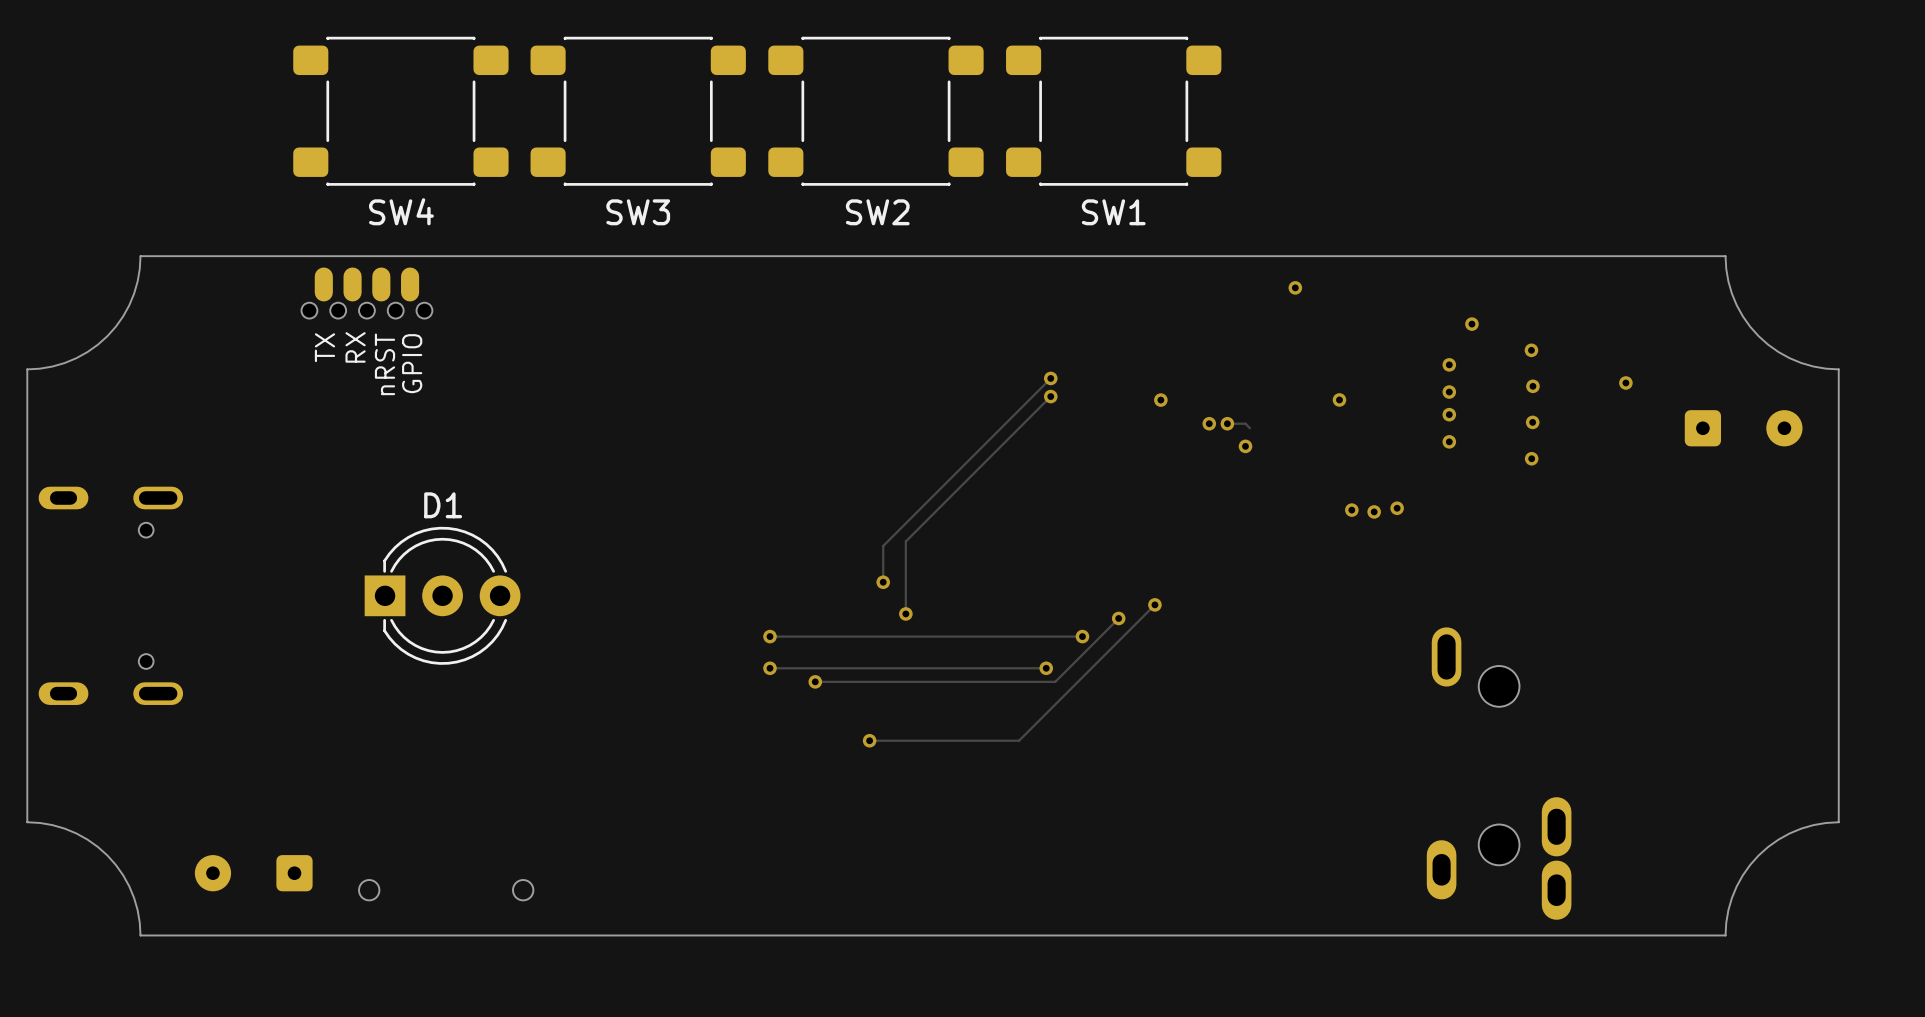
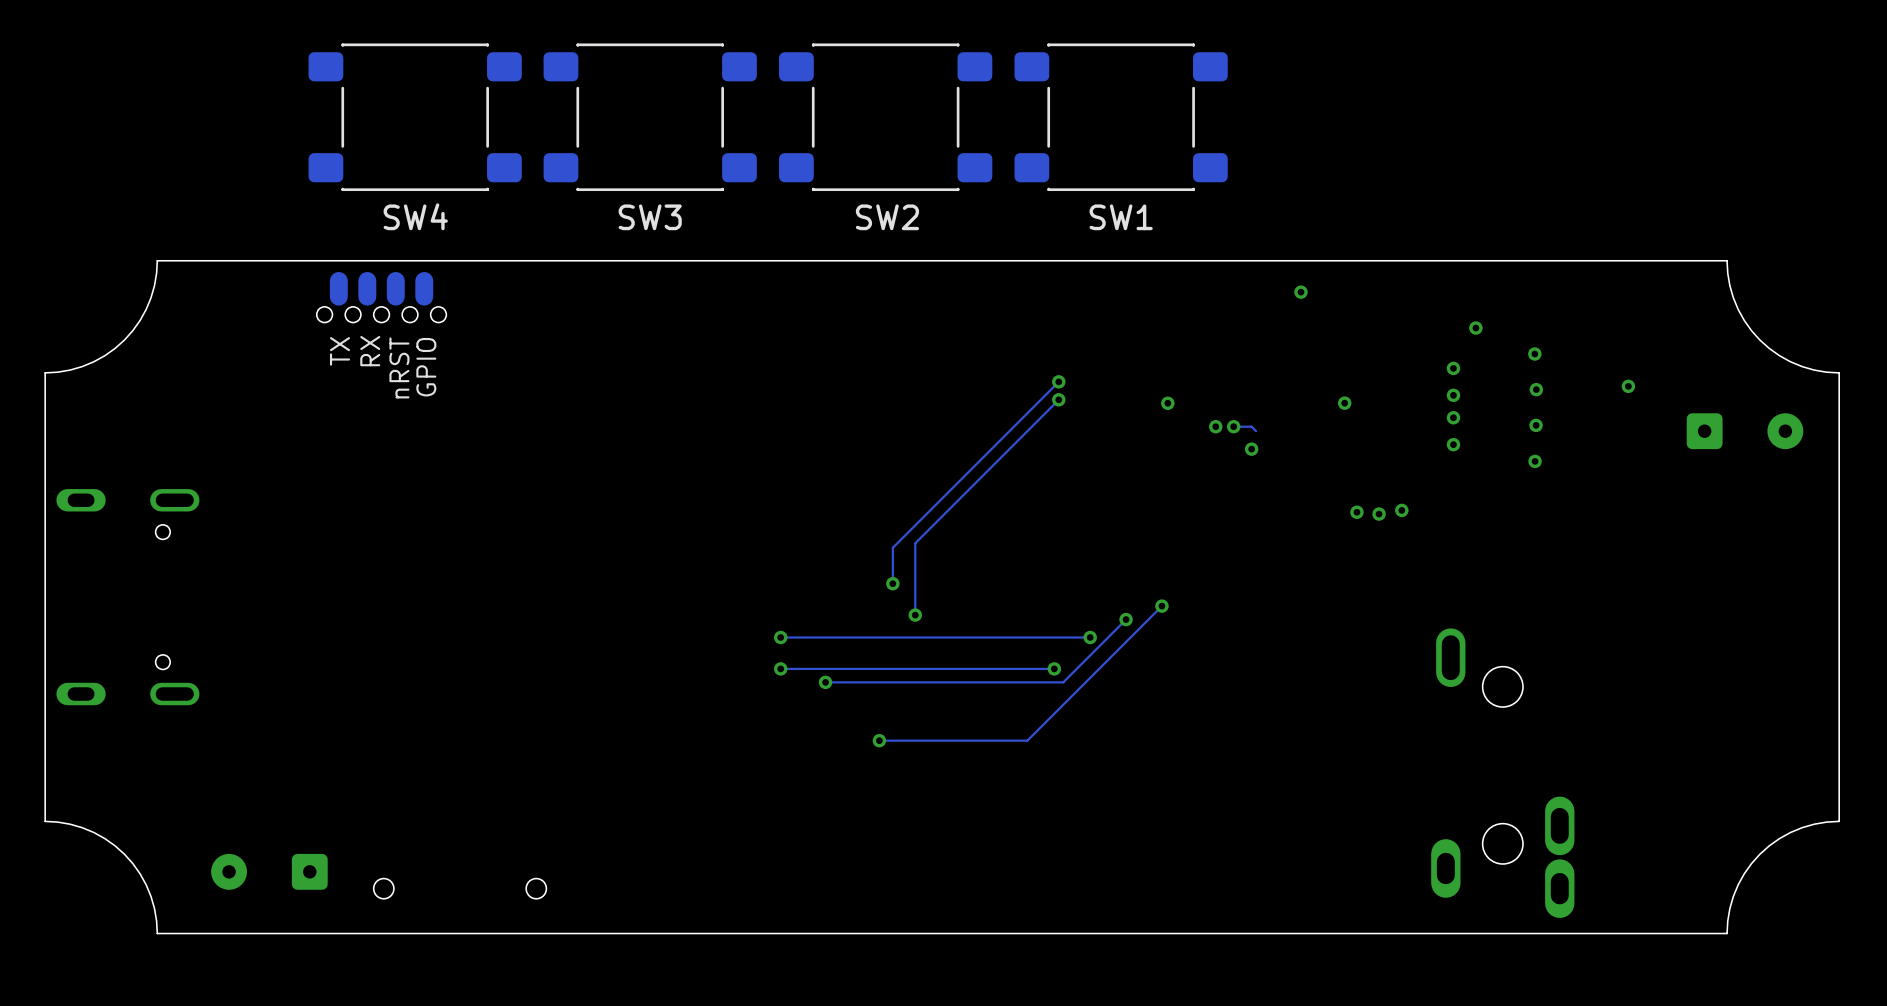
D1: (442, 595) -> none

